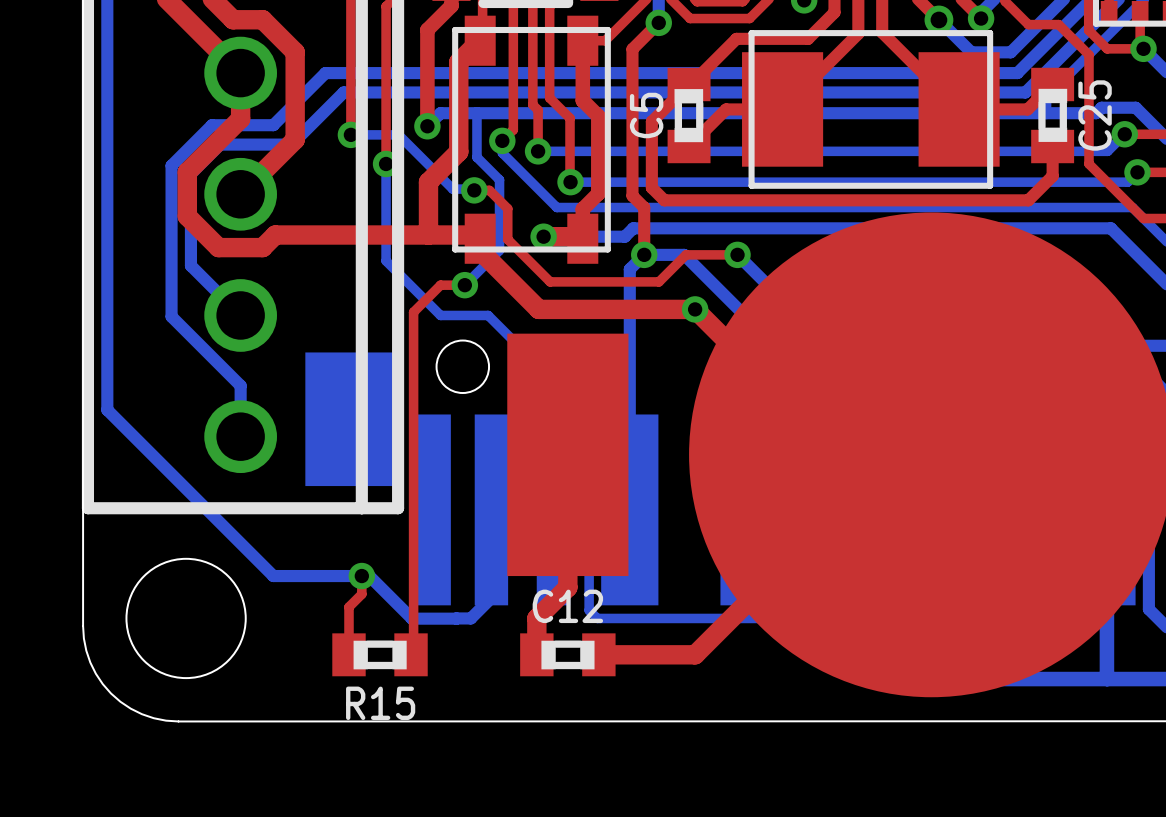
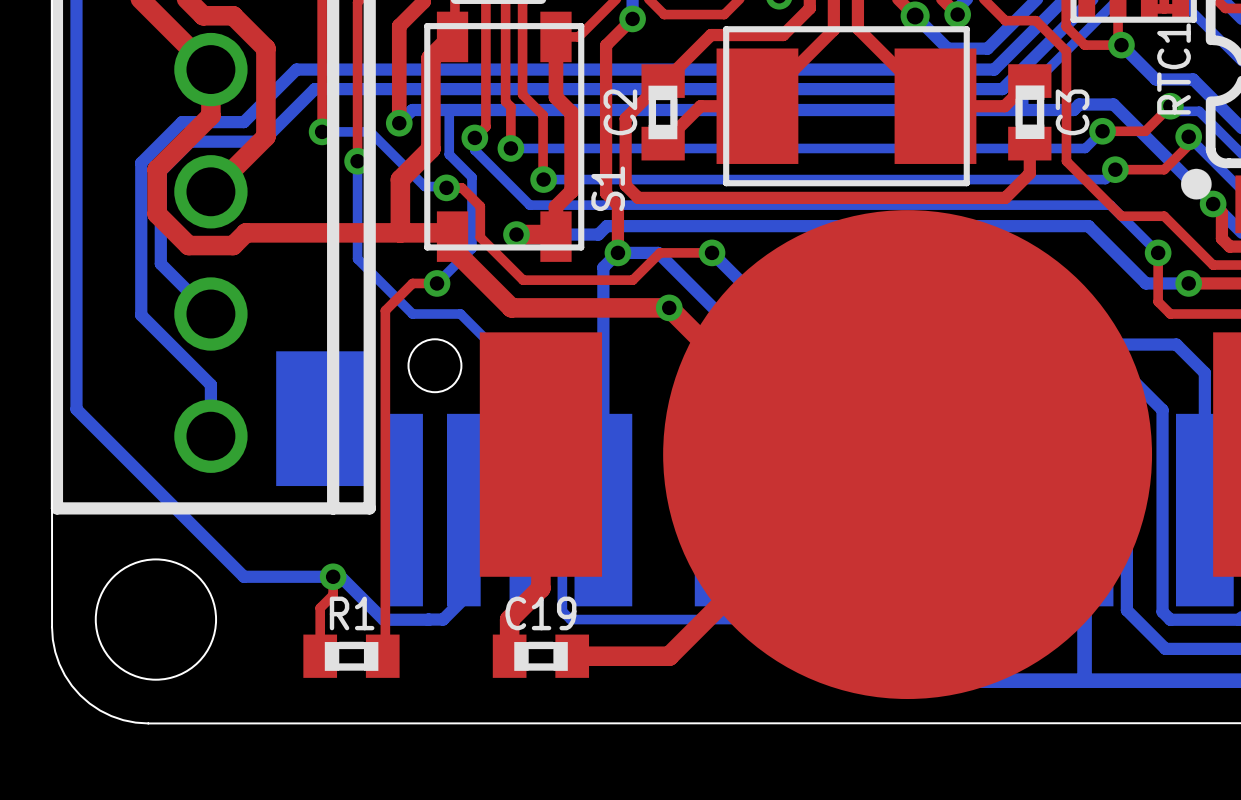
C5 name: C5 (646, 115) -> C2 (620, 112)
C25 name: C25 (1095, 115) -> C3 (1072, 112)
S1 name: none -> S1 (608, 188)
C12 name: C12 (567, 606) -> C19 (540, 613)
R15 name: R15 (380, 703) -> R1 (352, 613)

